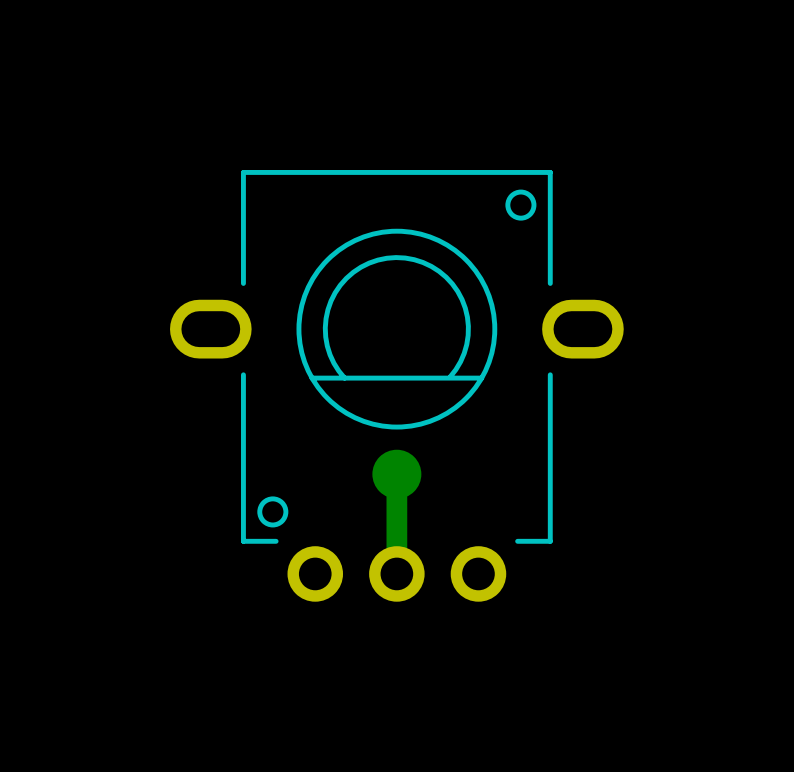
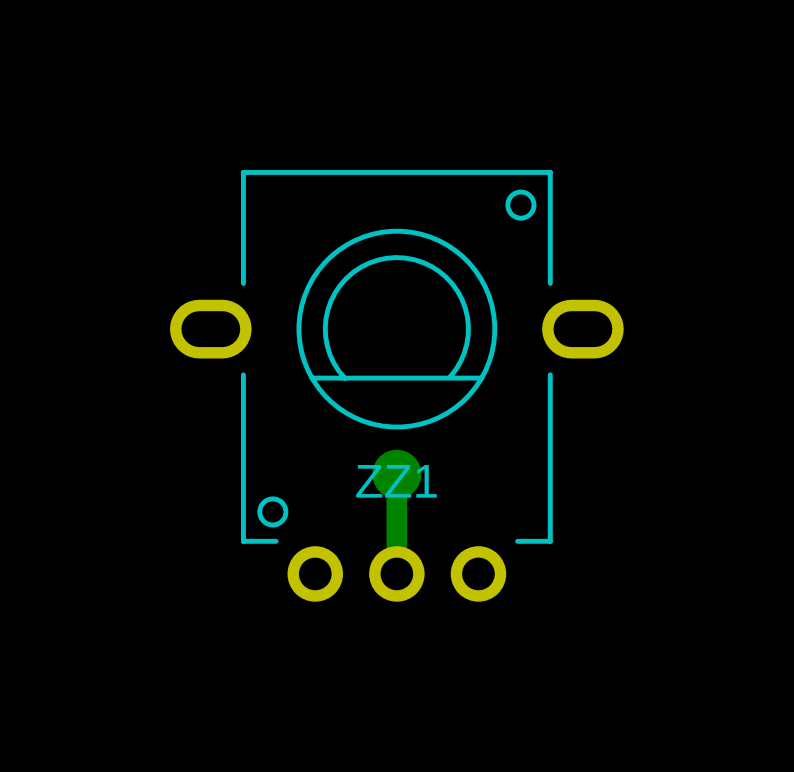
ZZ1 name: none -> ZZ1 (396, 481)

